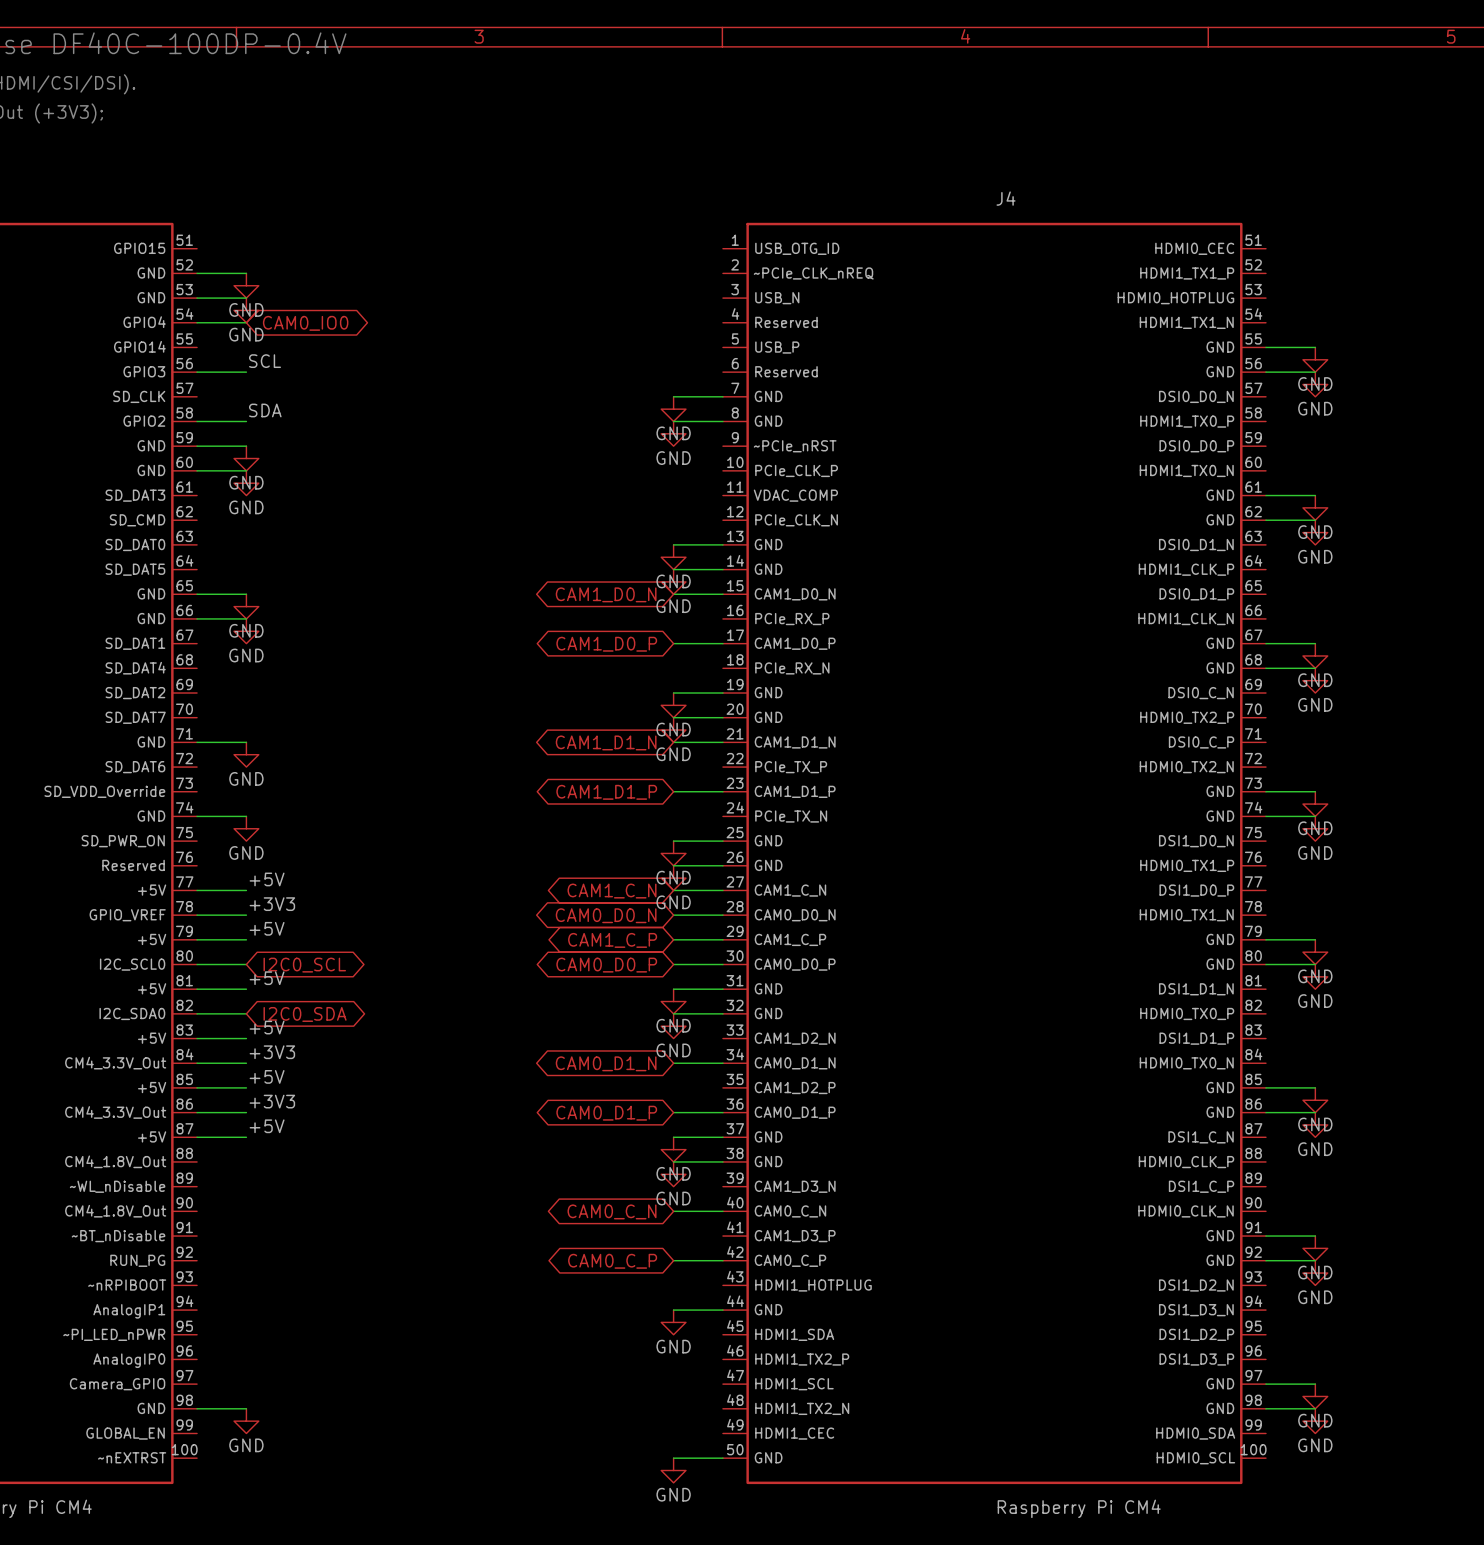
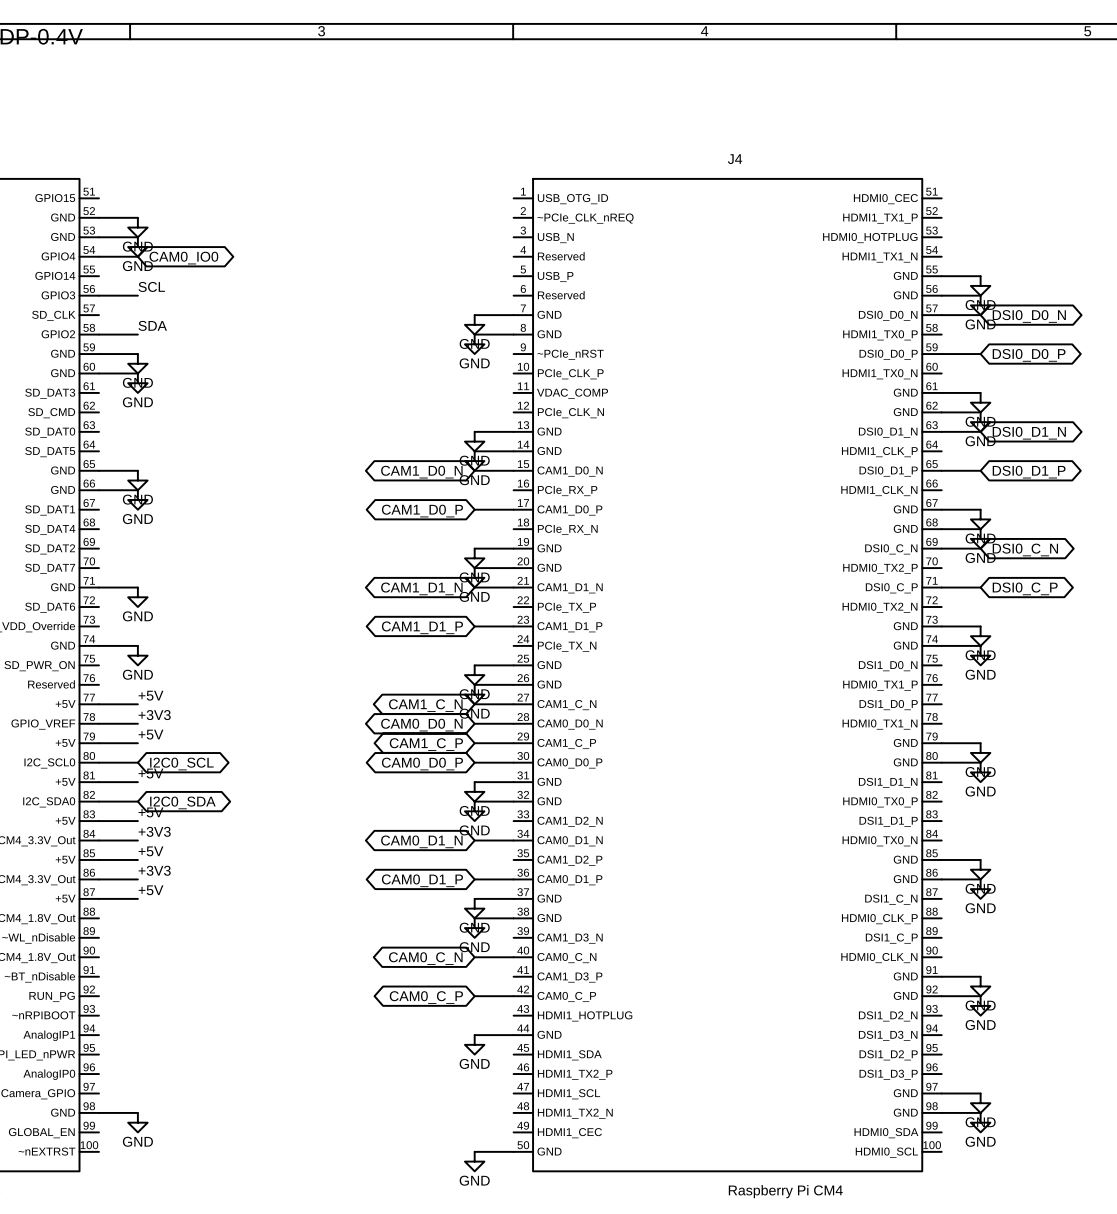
wire: none -> (941, 315) (980, 315)
global label: none -> DSI0_D0_N (1029, 316)
wire: none -> (941, 354) (980, 354)
global label: none -> DSI0_D0_P (1029, 355)
wire: none -> (941, 431) (980, 431)
global label: none -> DSI0_D1_N (1029, 433)
wire: none -> (941, 470) (980, 470)
global label: none -> DSI0_D1_P (1029, 472)
wire: none -> (941, 548) (980, 548)
global label: none -> DSI0_C_N (1025, 549)
wire: none -> (941, 587) (980, 587)
global label: none -> DSI0_C_P (1025, 588)

